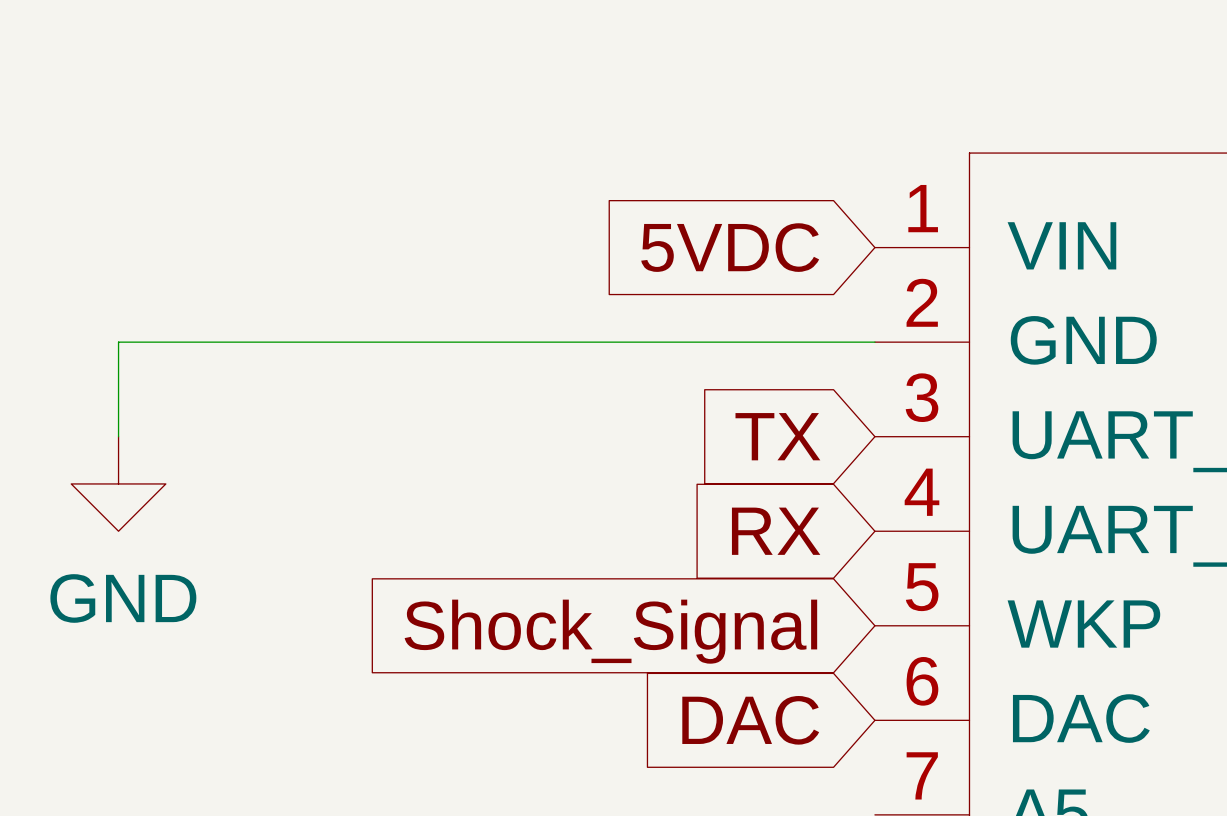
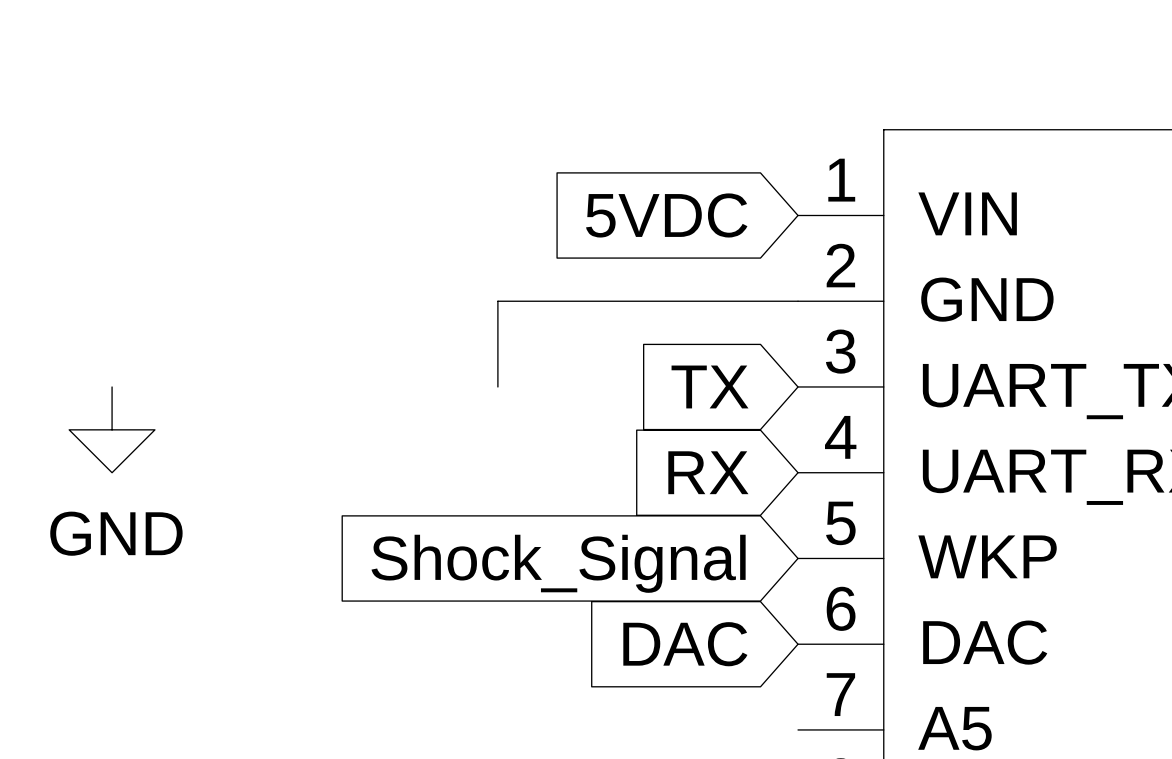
wire: (544, 342) (118, 342) (118, 436) -> (497, 301) (497, 386)

